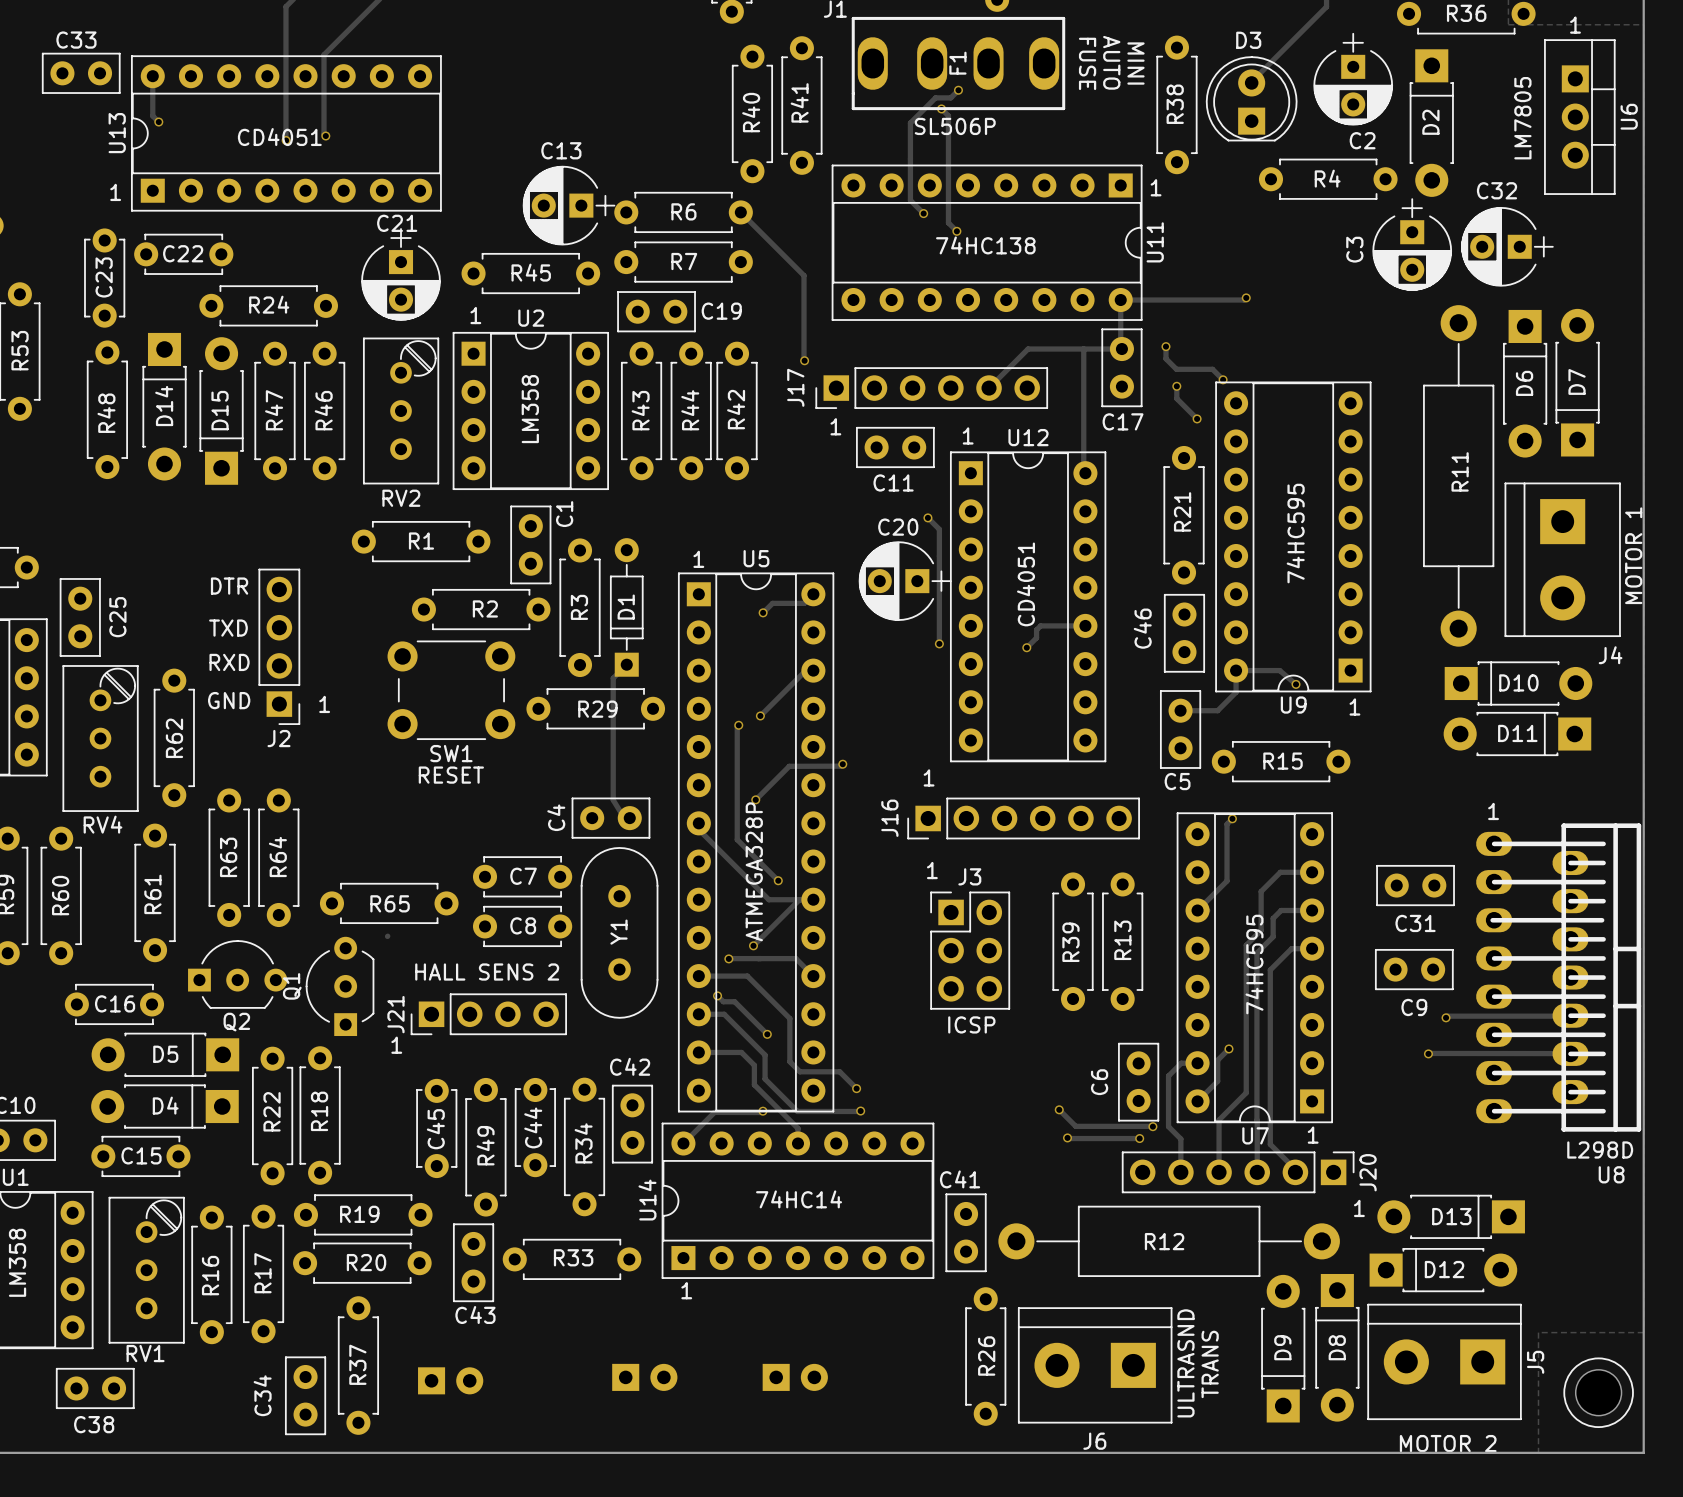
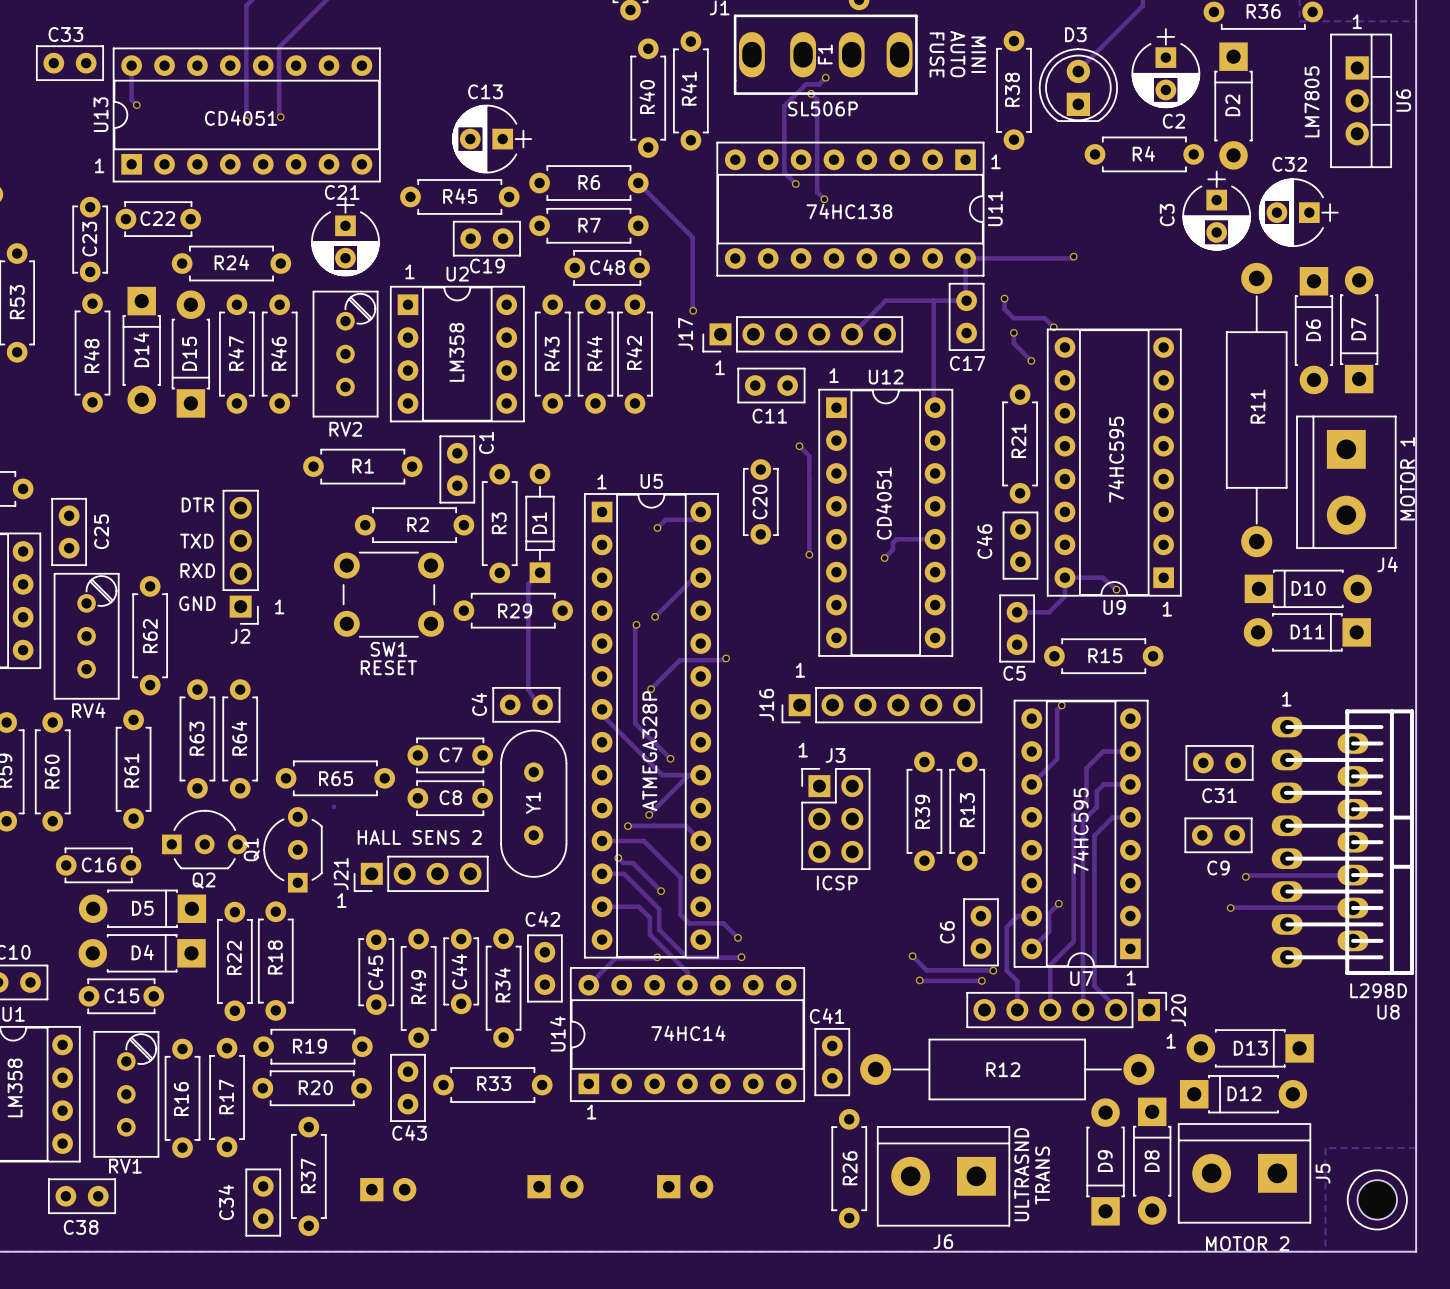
C13 position: (569, 205) -> (492, 139)
R45 position: (530, 273) -> (459, 196)
C48: none -> (607, 267)
C19 position: (656, 311) -> (486, 238)
C19 name position: C19 (721, 311) -> C19 (487, 266)
C20 name position: C20 (898, 527) -> C20 (760, 501)
C20 footprint: [858, 541, 952, 621] -> [743, 459, 779, 545]

